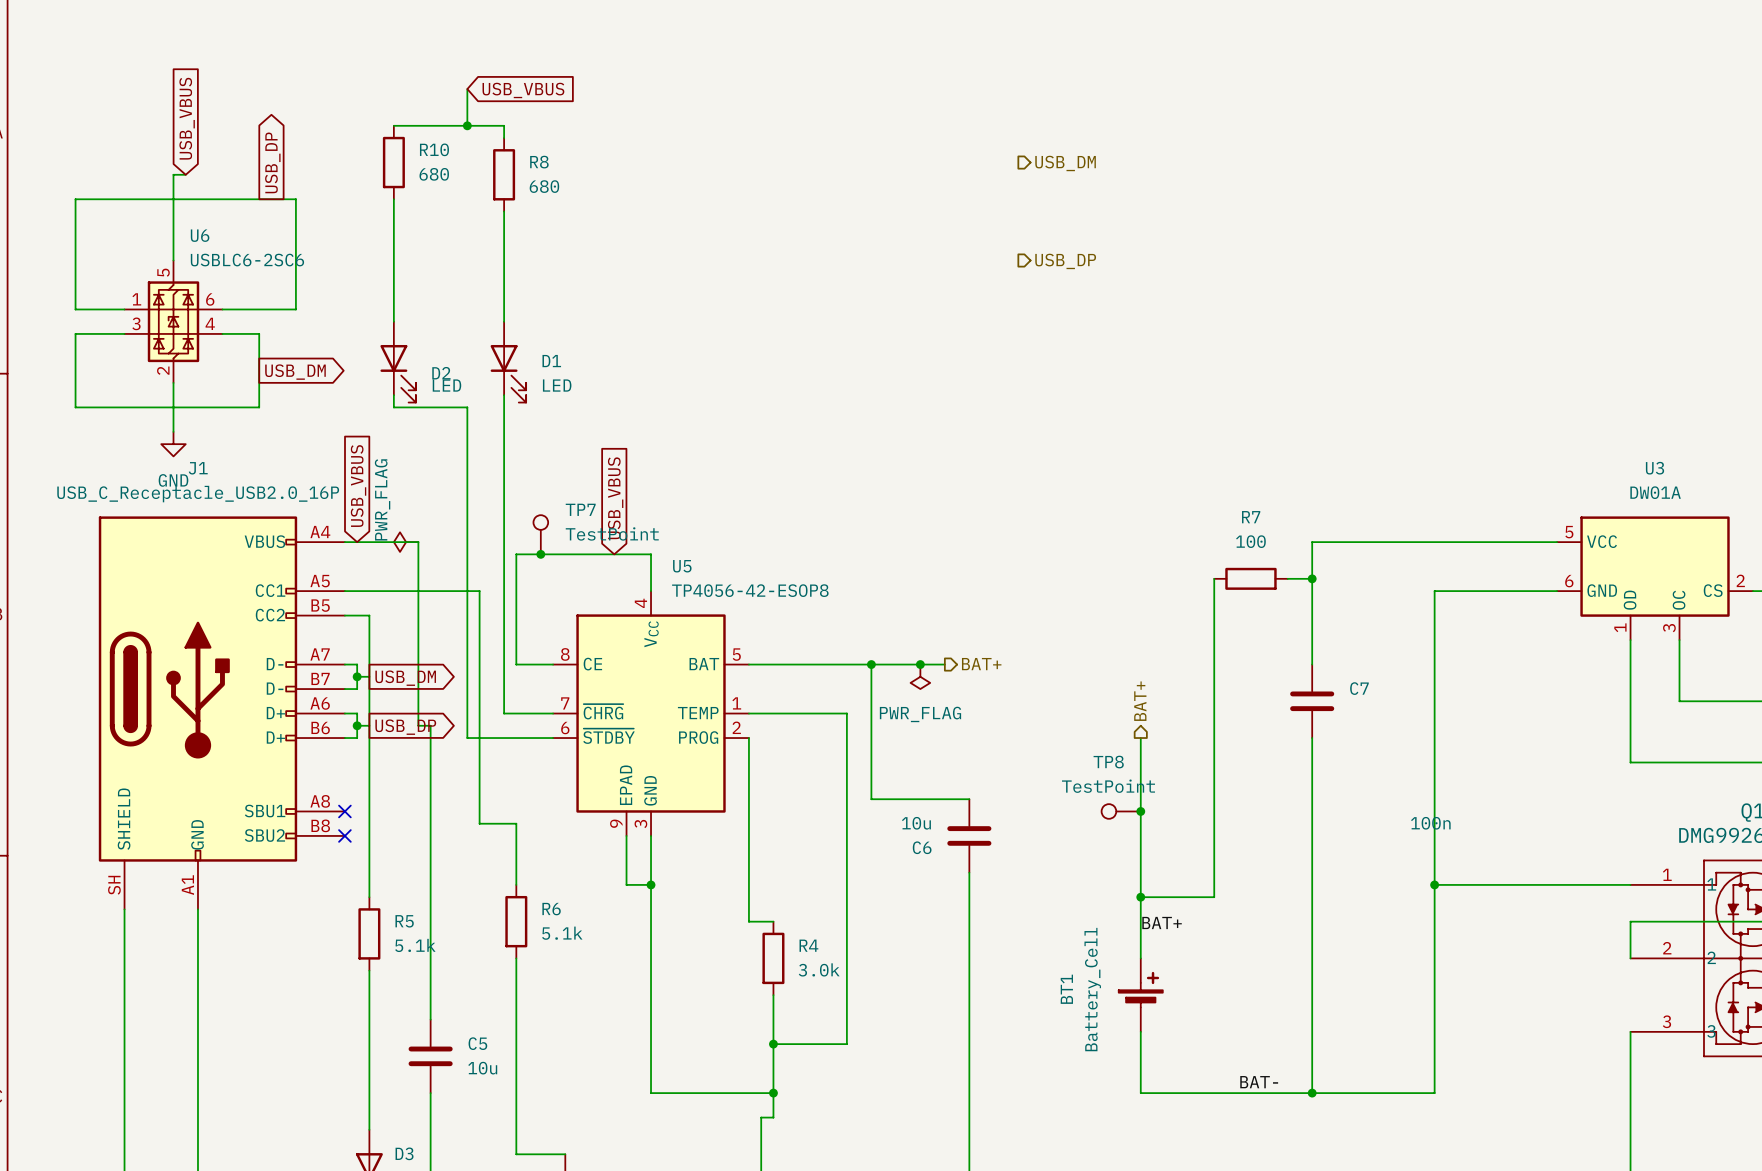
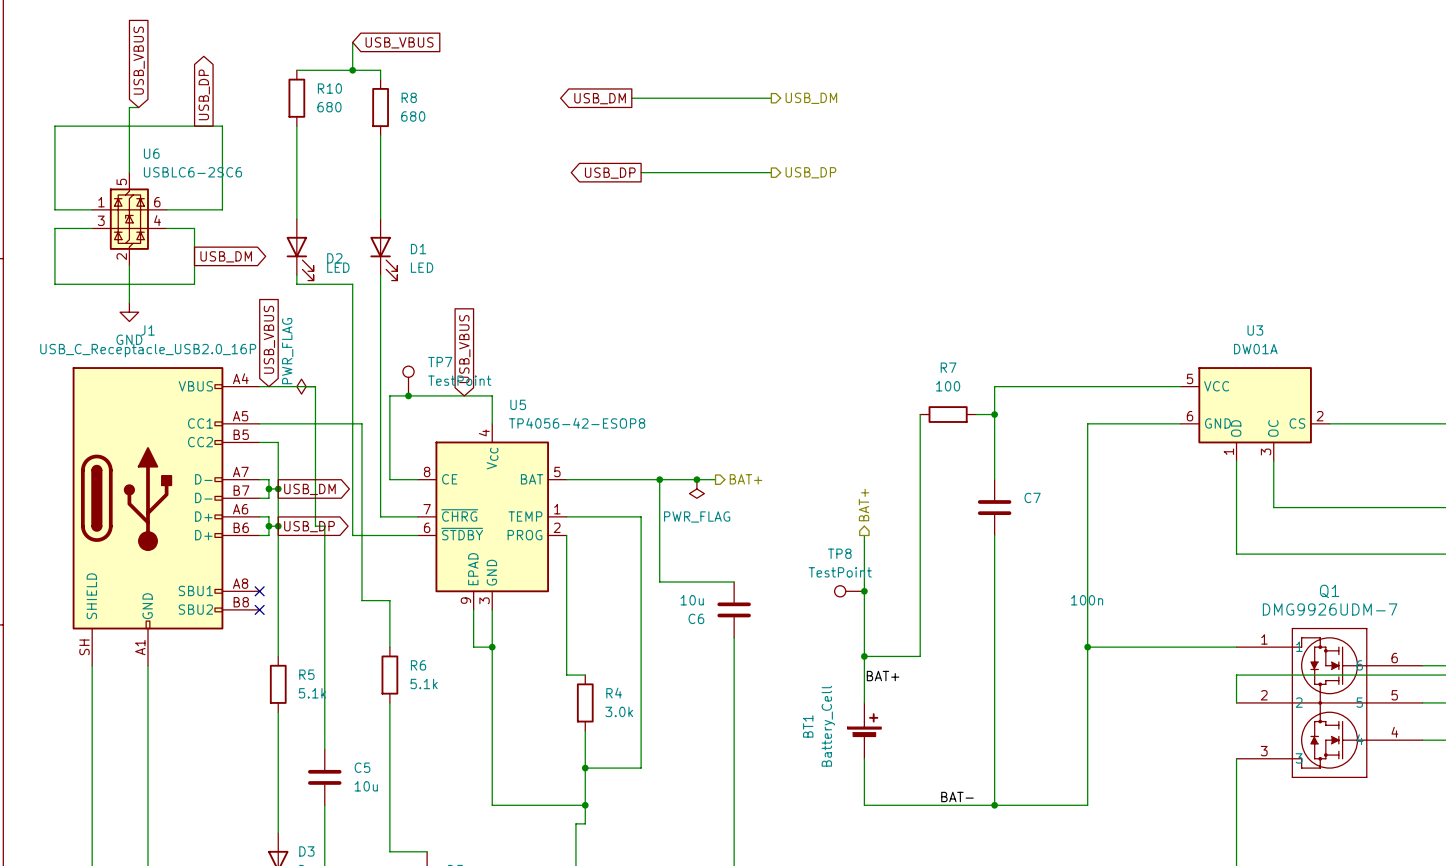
wire: none -> (631, 98) (771, 98)
global label: none -> USB_DM (600, 98)
wire: none -> (641, 172) (771, 172)
global label: none -> USB_DP (610, 173)
junction: none -> (278, 488)
junction: none -> (278, 526)

